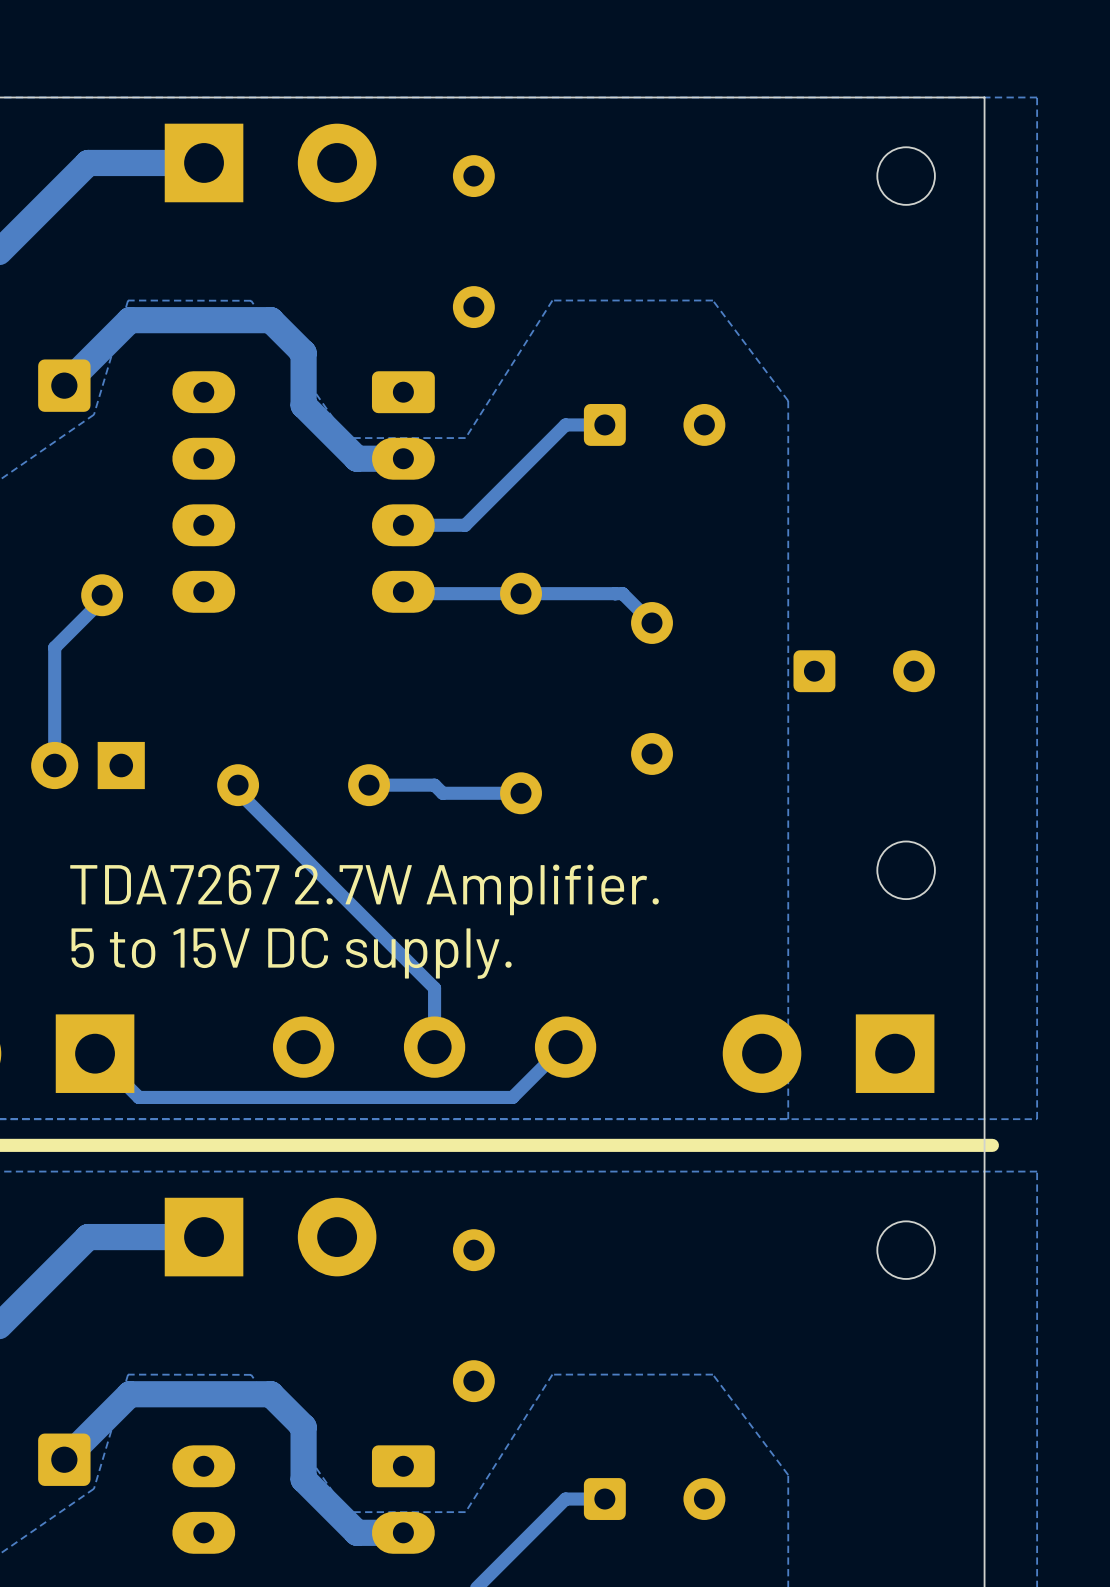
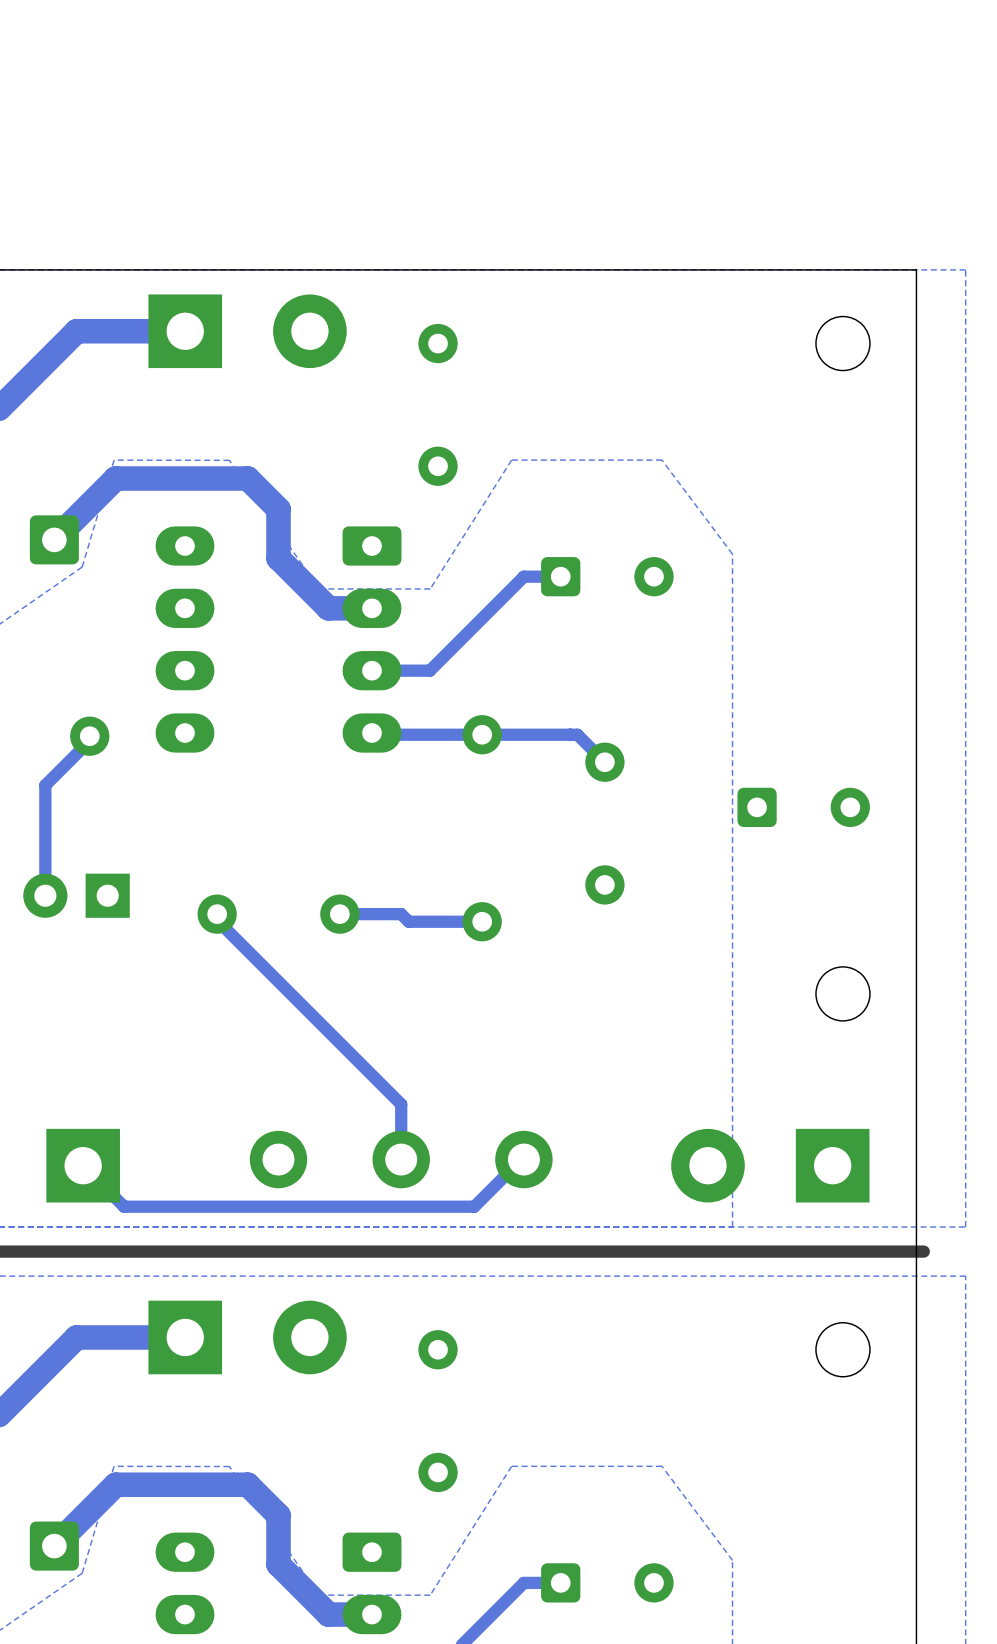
text: TDA7267 2.7W Amplifier. (364, 889) -> none
text: 5 to 15V DC supply. (291, 953) -> none

